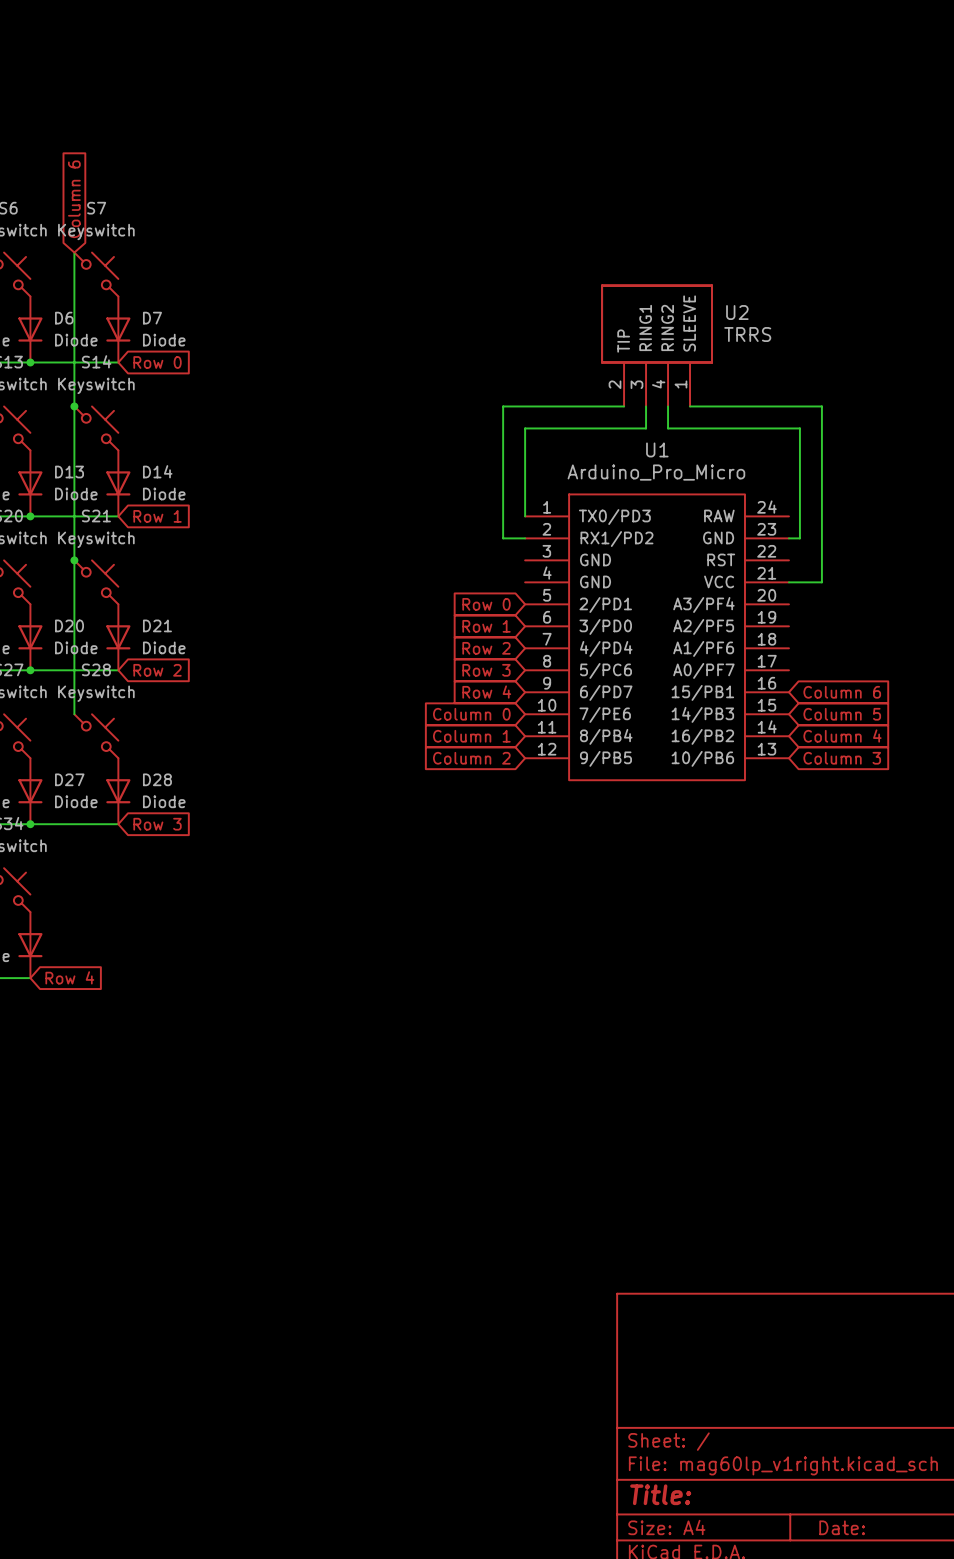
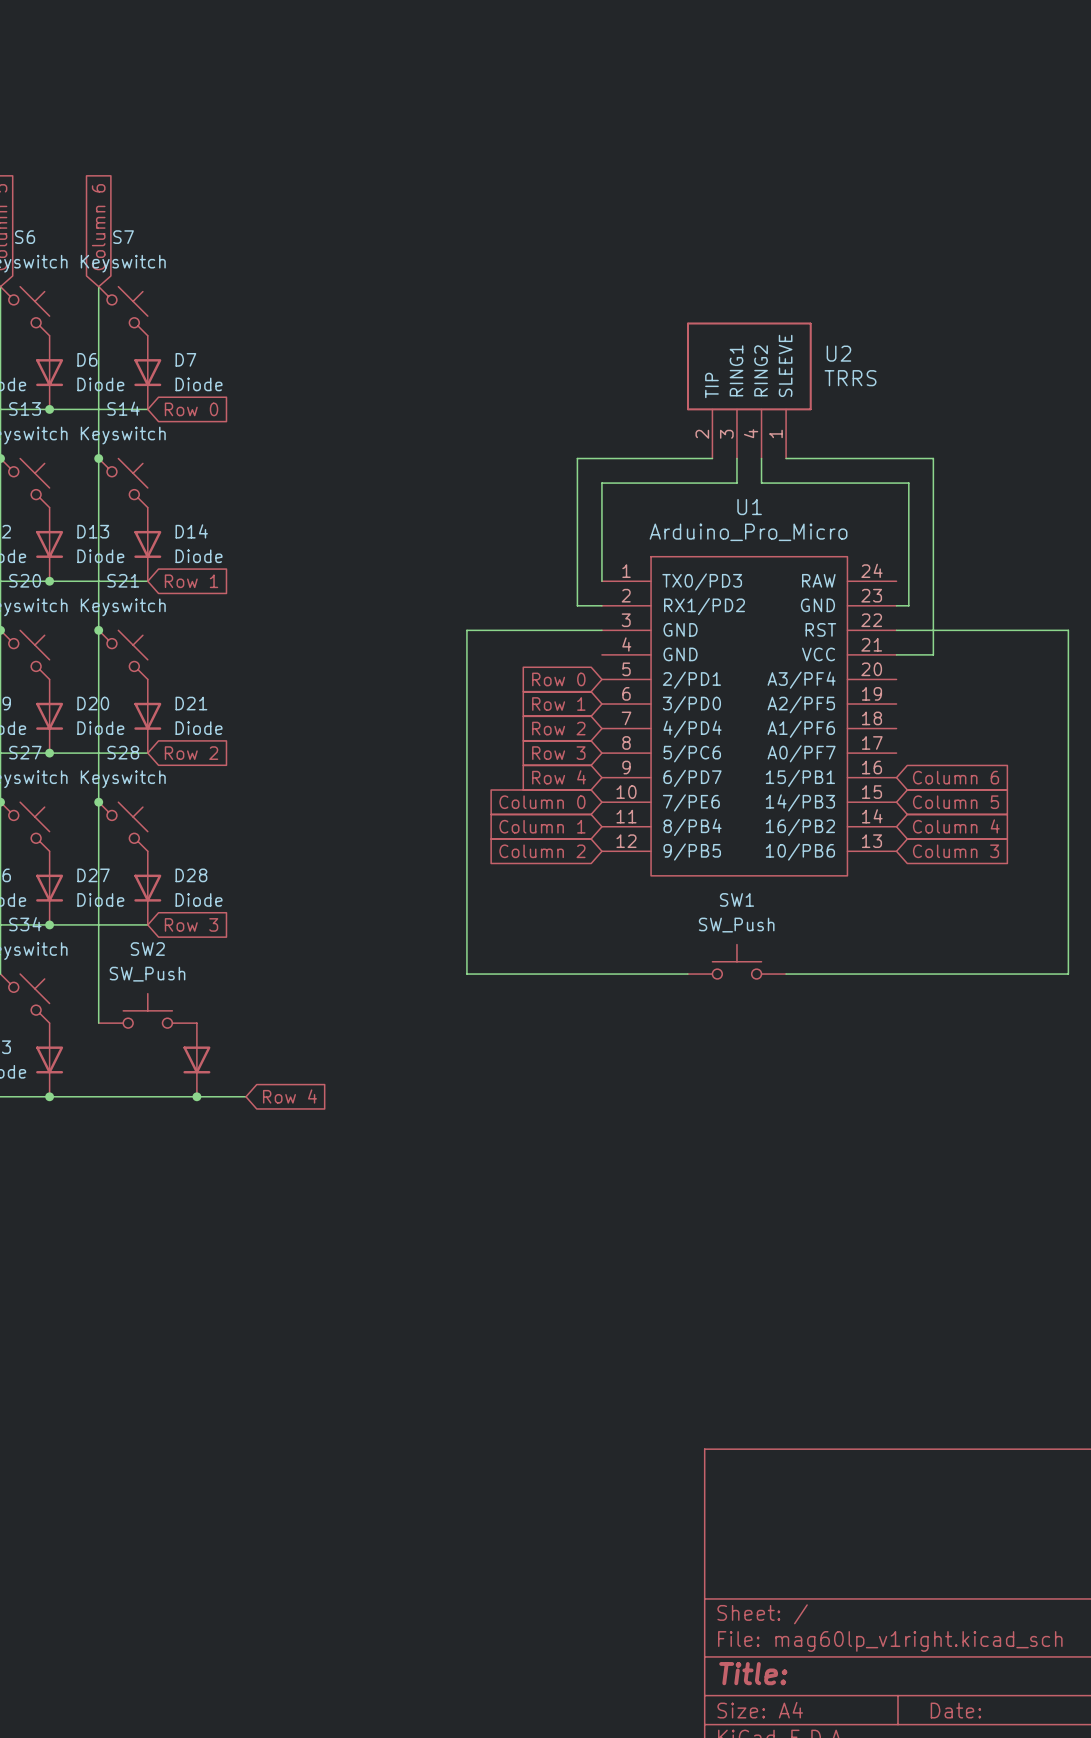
wire: none -> (601, 630) (466, 630) (466, 974) (687, 974)
wire: none -> (896, 630) (1068, 630) (1068, 974) (786, 974)
wire: none -> (98, 802) (98, 1023)
junction: none -> (98, 802)
SW1: none -> SW_Push (736, 961)
SW2: none -> SW_Push (147, 1010)
part: none -> (196, 1059)
global label position: Row 4 (69, 977) -> Row 4 (290, 1096)
wire: none -> (49, 1096) (246, 1096)
junction: none -> (49, 1096)
junction: none -> (196, 1096)

